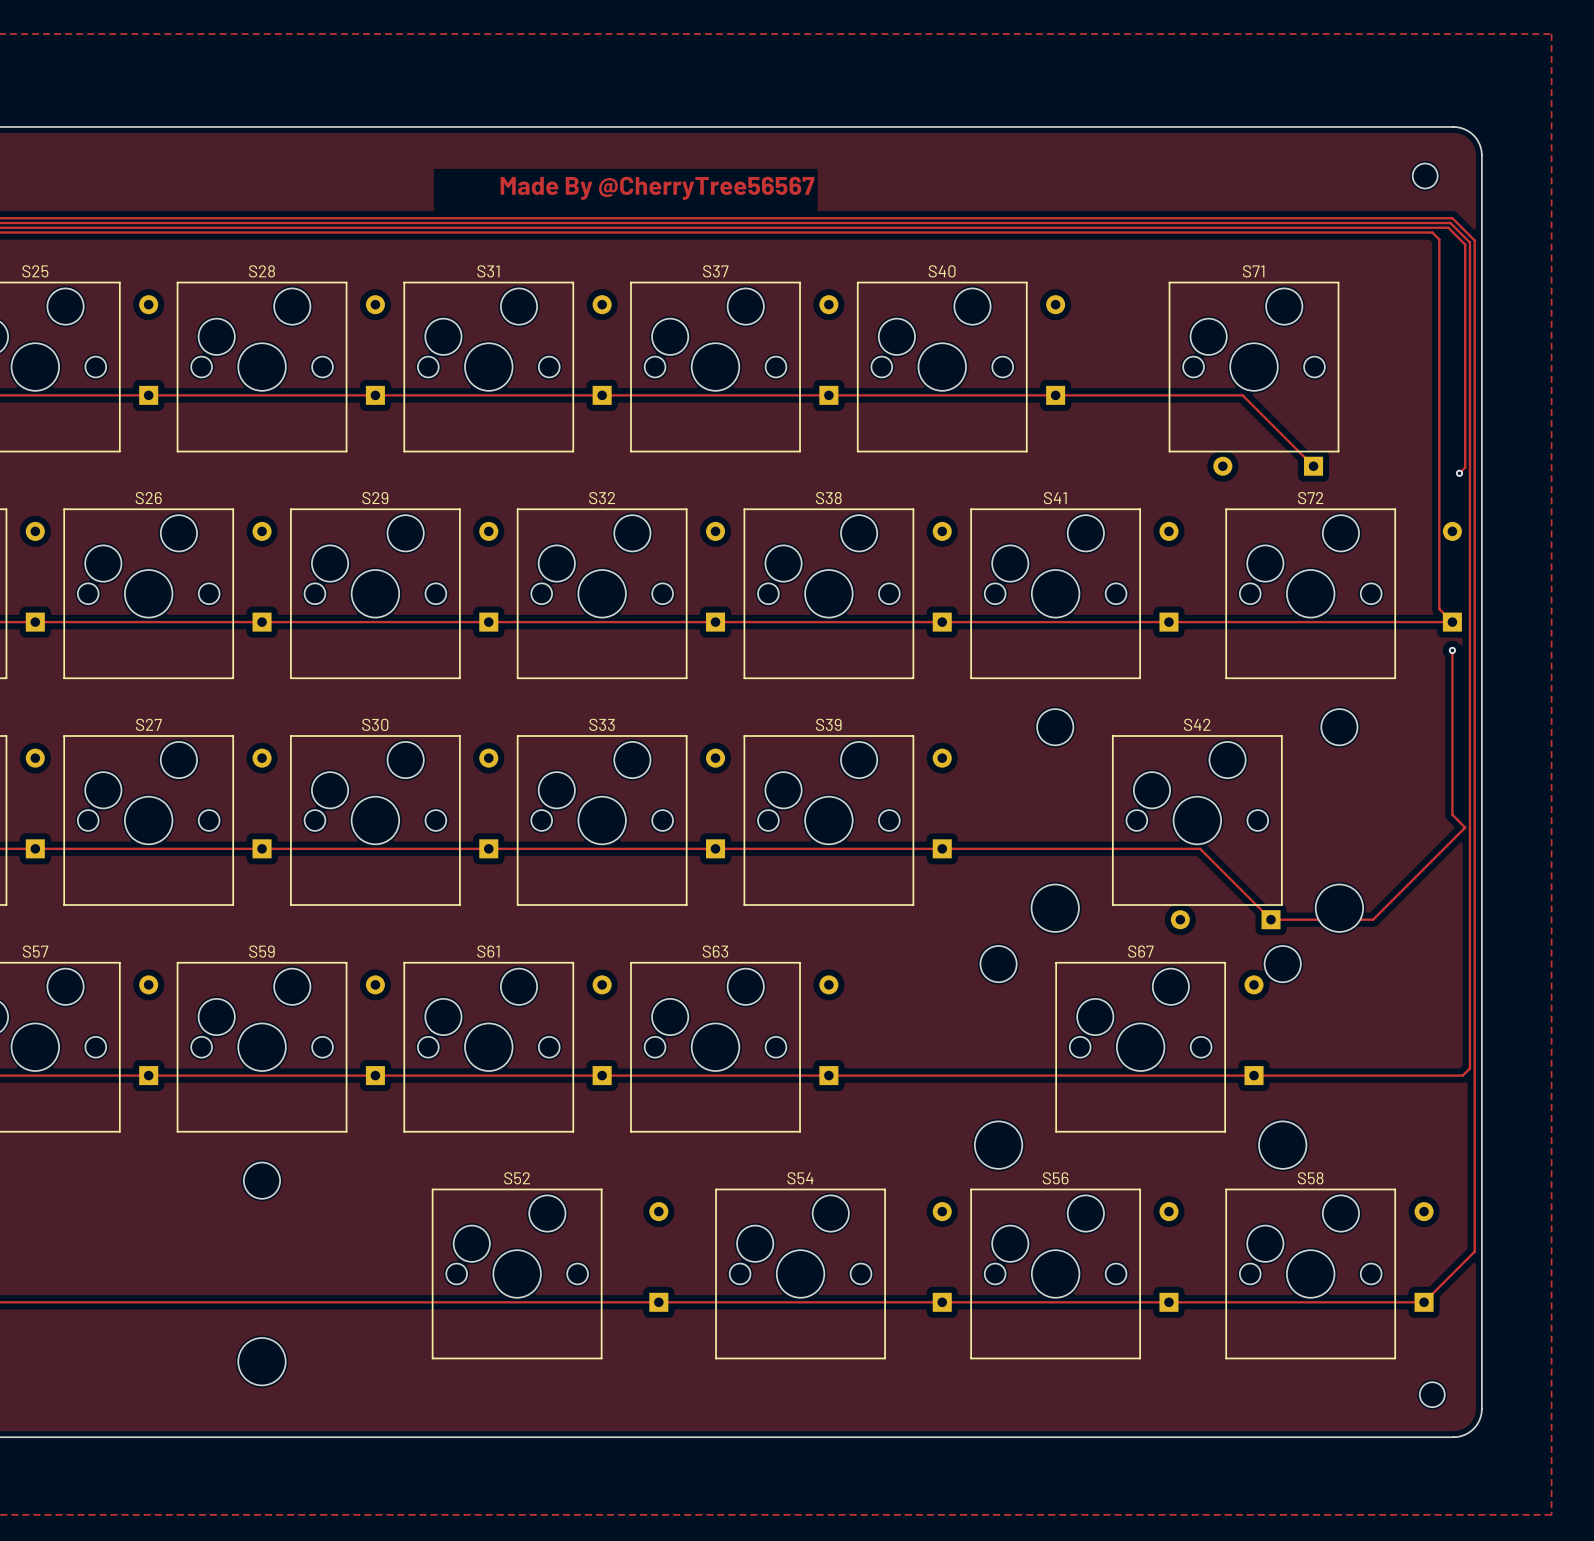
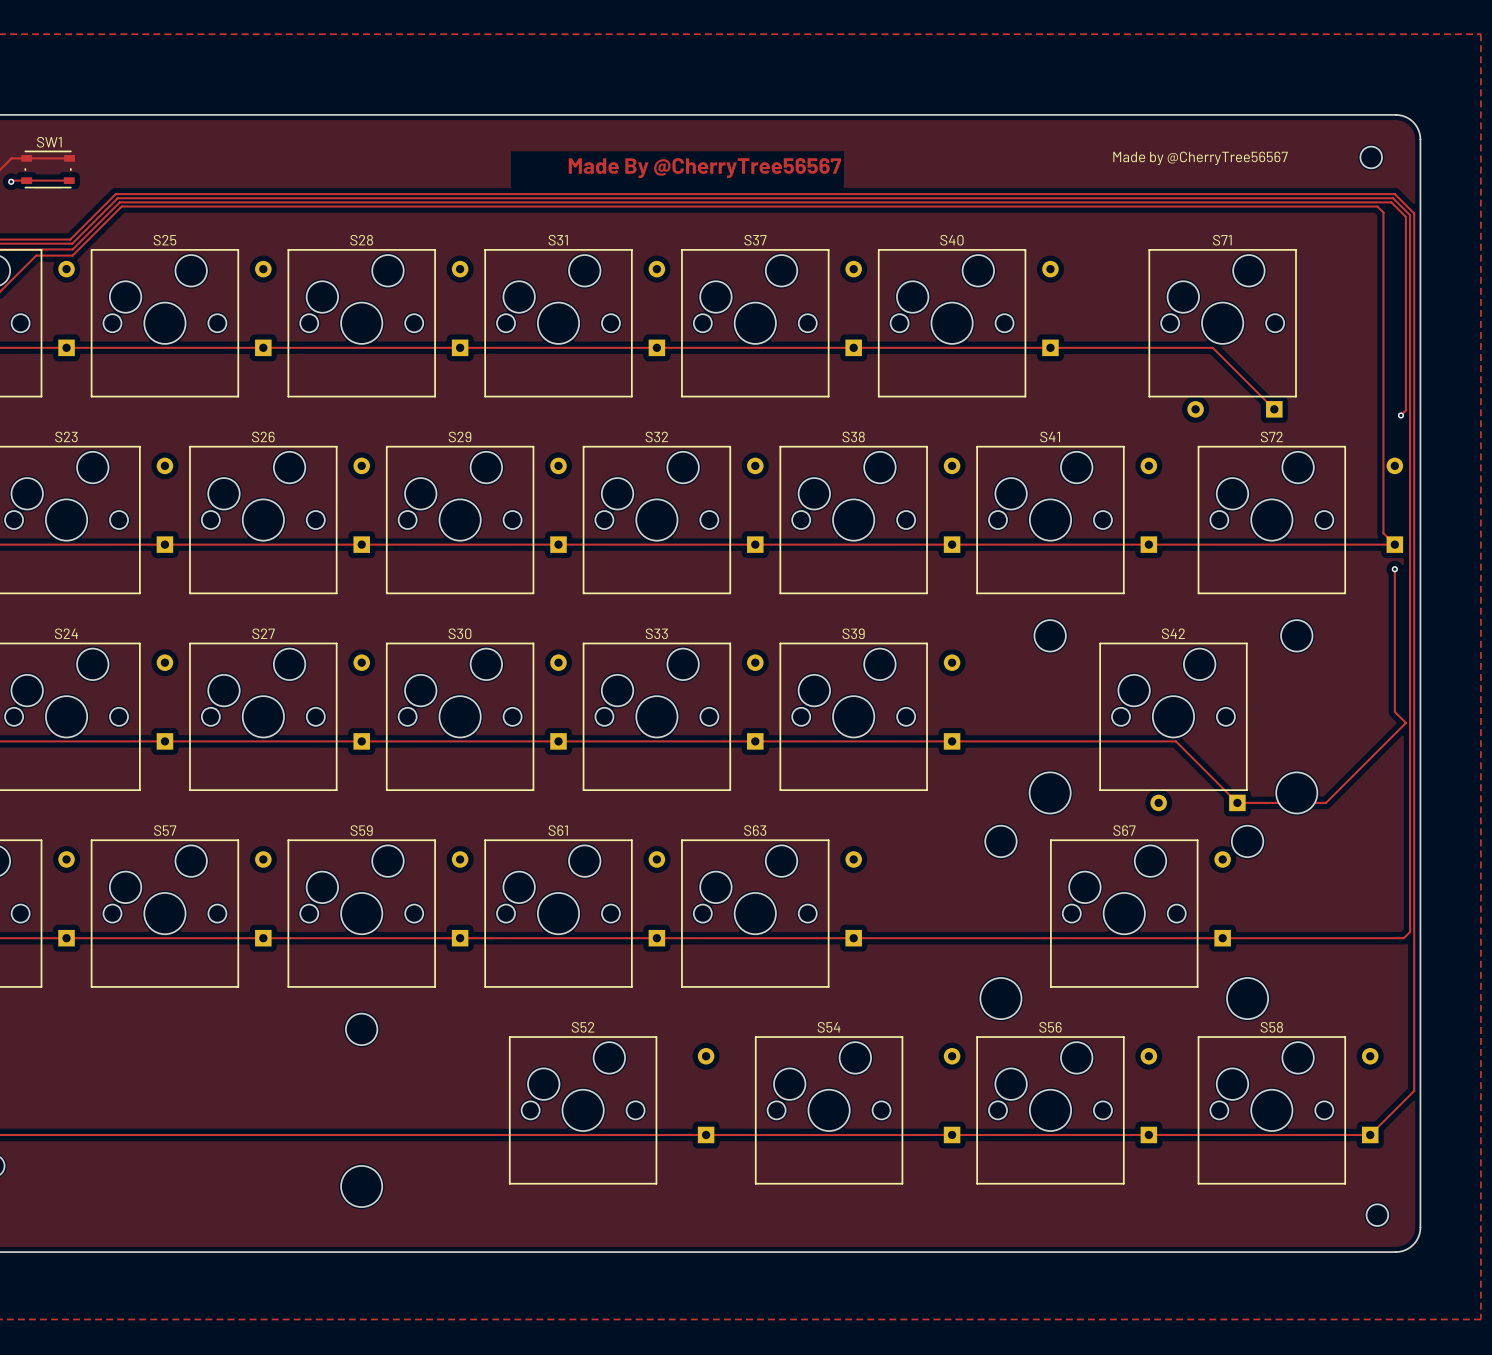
text: none -> Made by @CherryTree56567 (1200, 158)

